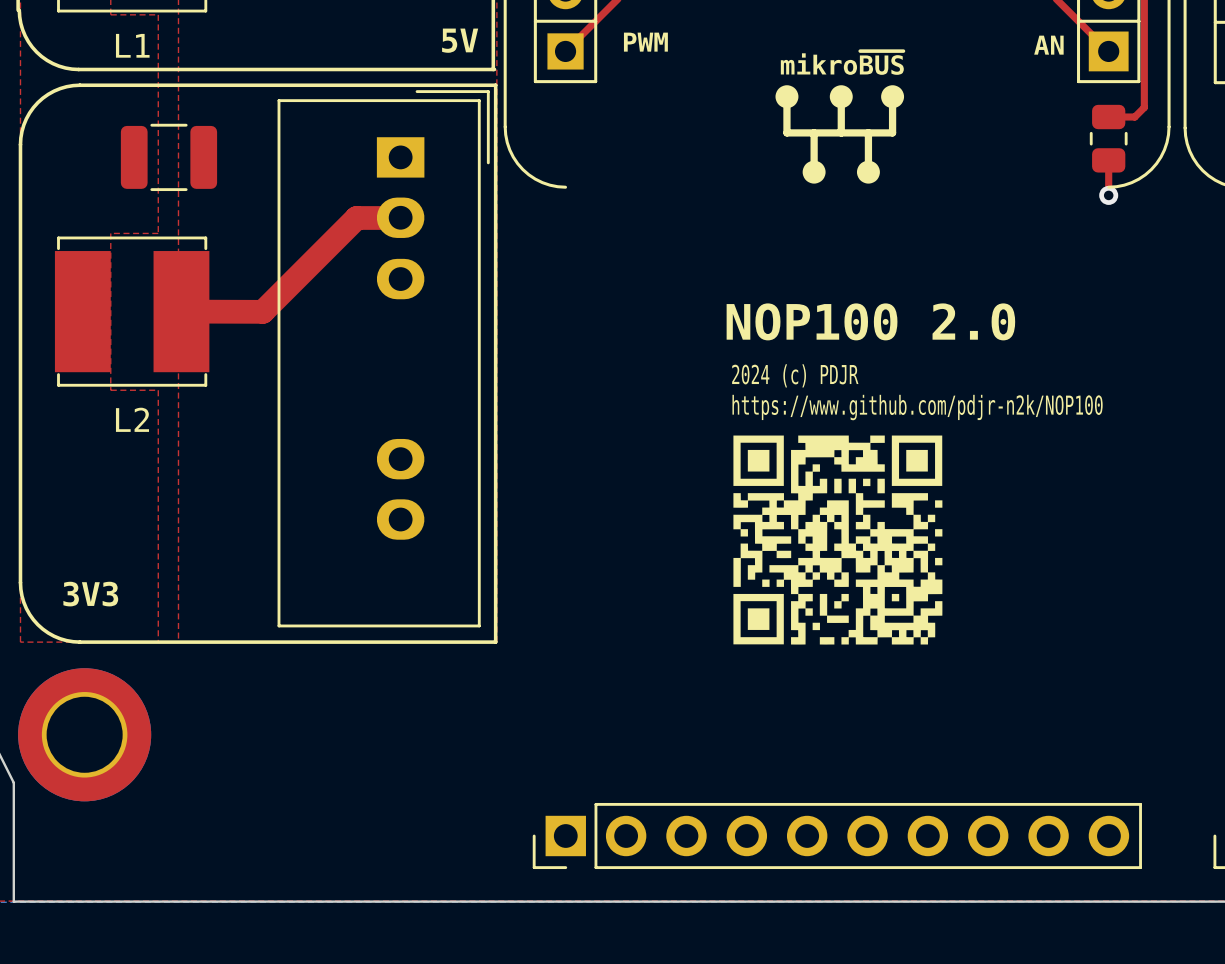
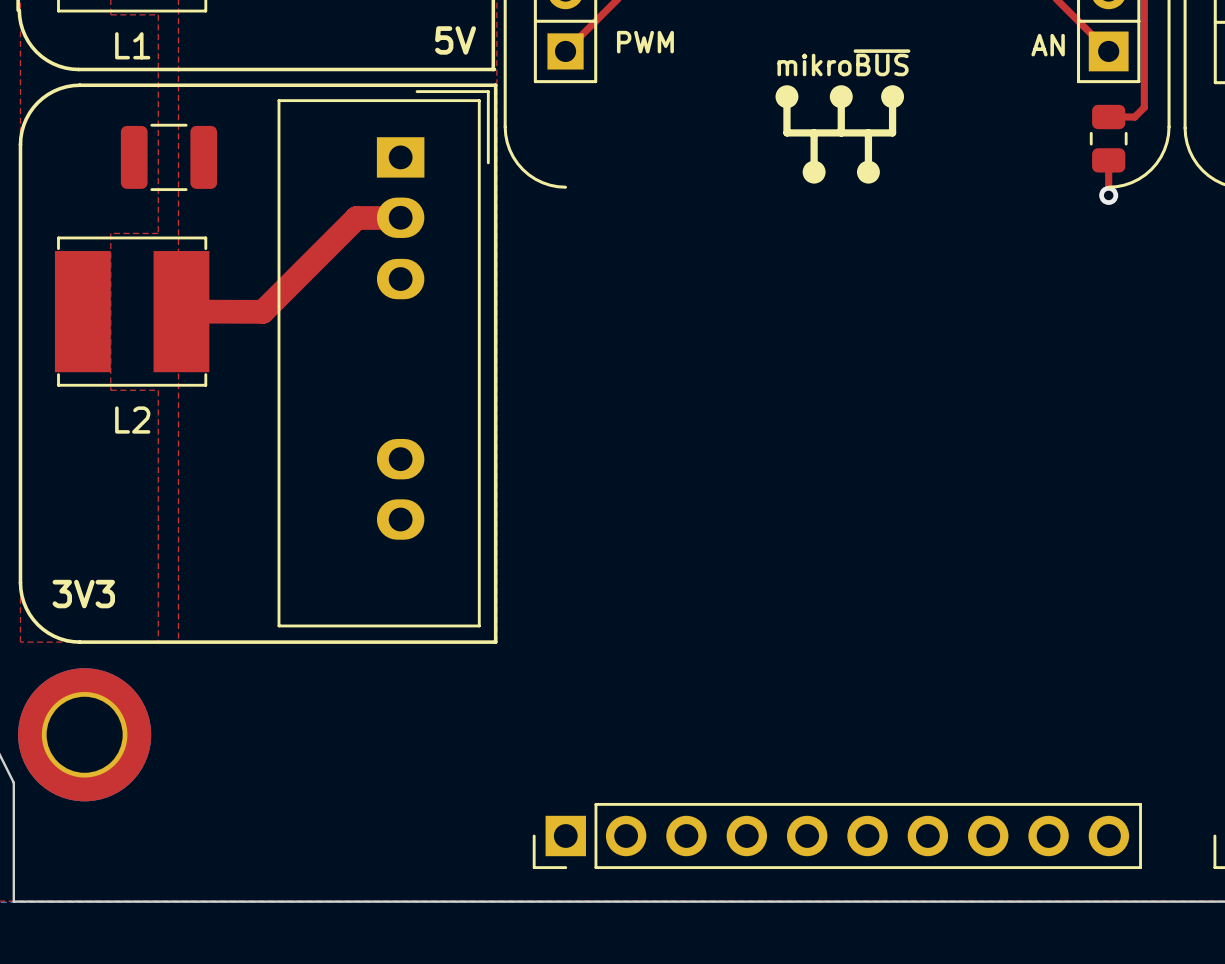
text: NOP100 2.0 (870, 321) -> none
text: 2024 (c) PDJR (795, 375) -> none
text: https://www.github.com/pdjr-n2k/NOP100 (917, 407) -> none
drawing: [733, 435, 943, 645] -> none

